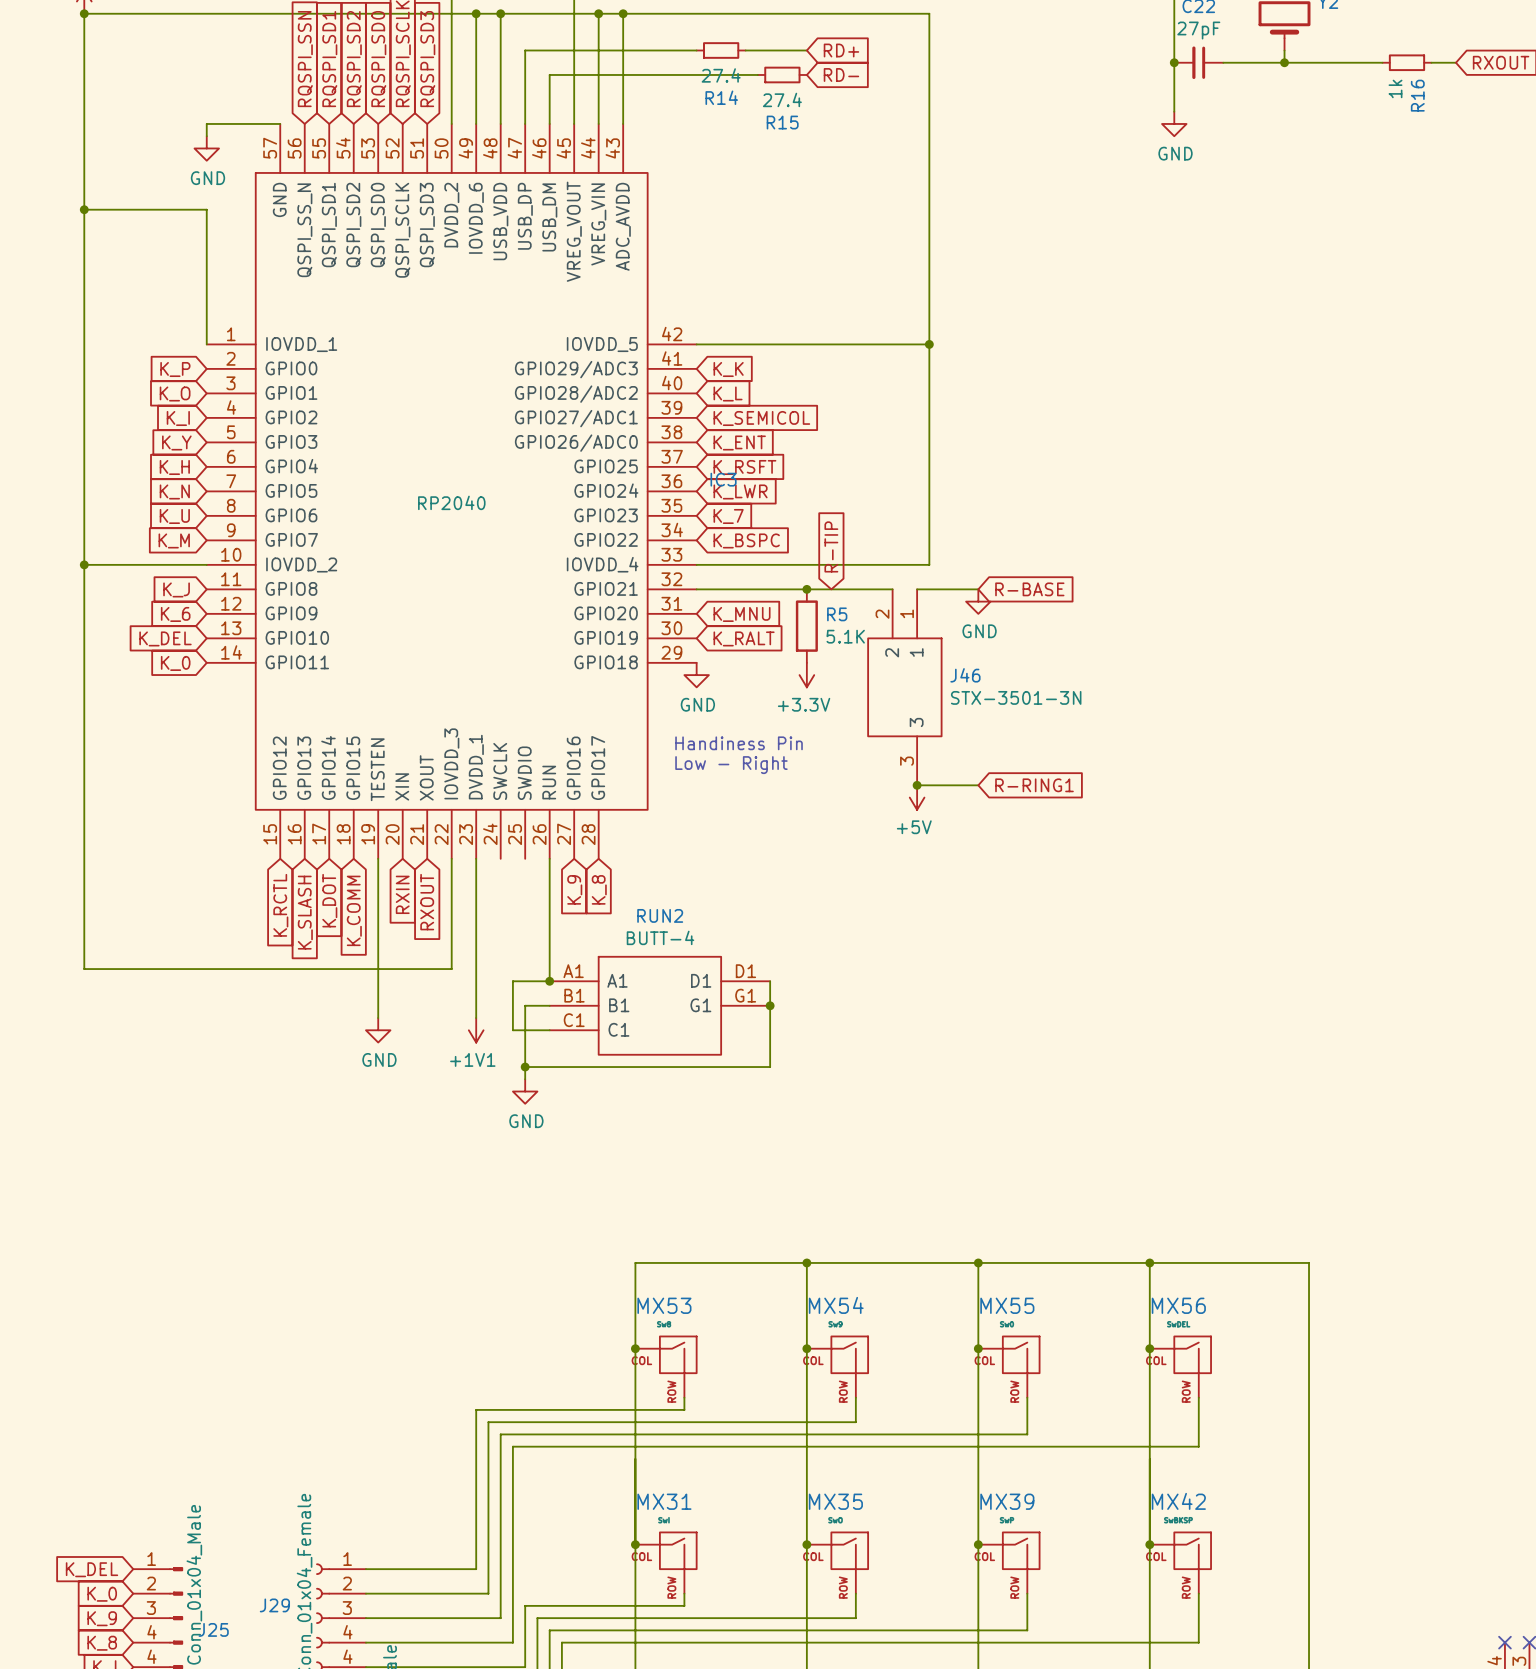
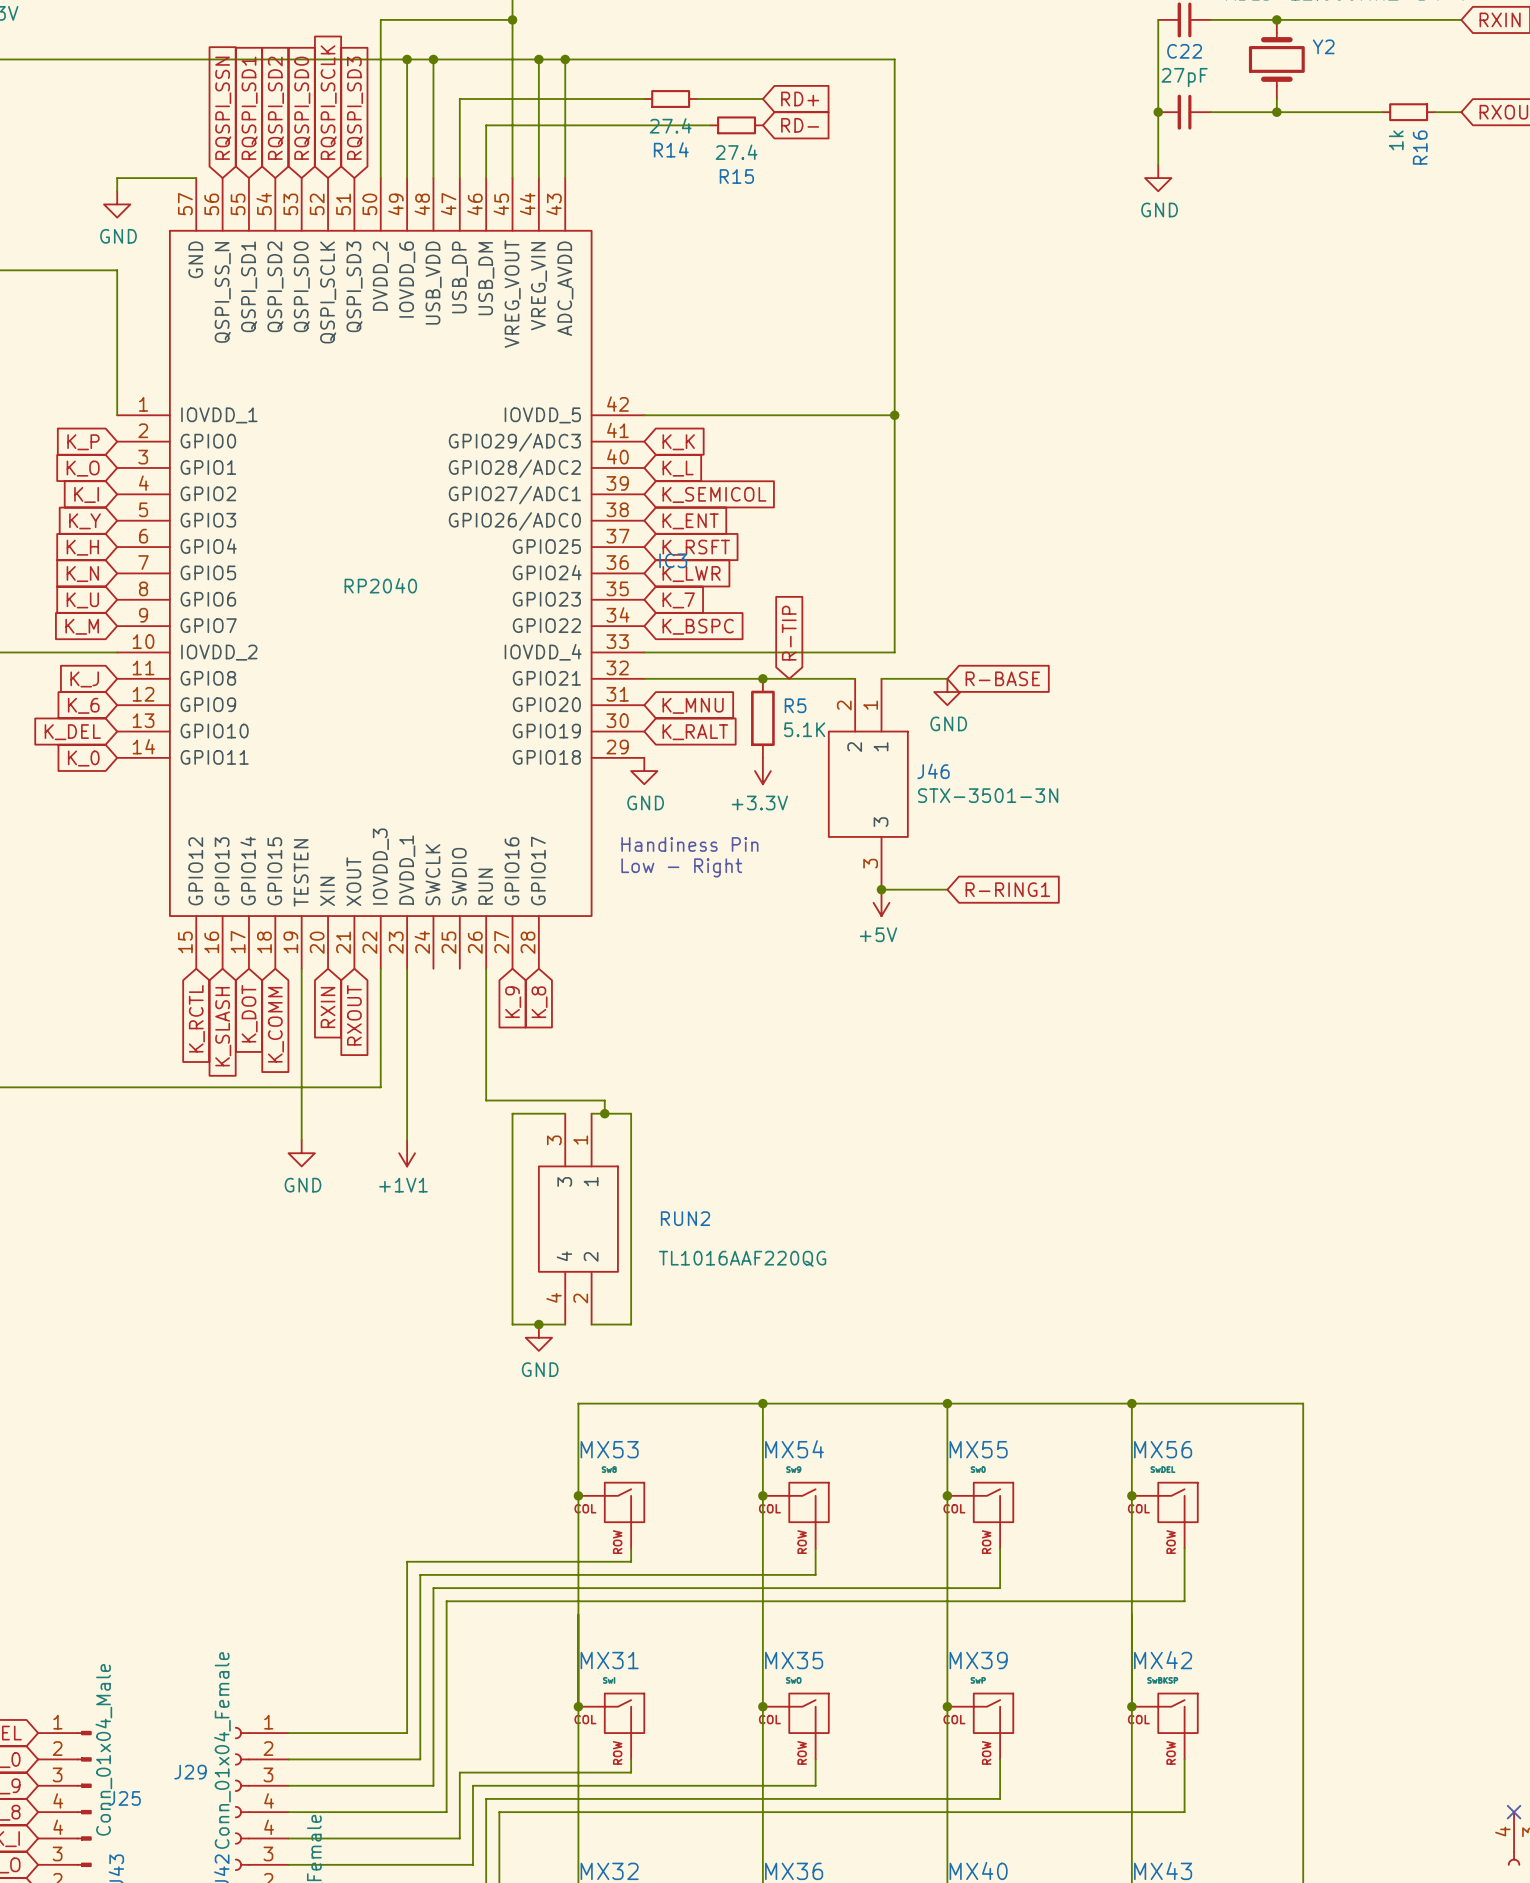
RUN2 name position: RUN2 (660, 915) -> RUN2 (685, 1218)
RUN2 value: BUTT-4 (660, 937) -> TL1016AAF220QG (742, 1258)
RUN2 symbol: [549, 956, 771, 1056] -> [538, 1113, 619, 1325]
wire: (549, 981) (512, 981) (512, 1030) (549, 1030) -> (486, 1100) (604, 1100) (604, 1113)
junction: (549, 981) -> none
wire: (770, 981) (770, 1067) (525, 1067) -> none
wire: none -> (565, 1113) (512, 1113) (512, 1324) (565, 1324)
wire: none -> (591, 1113) (631, 1113) (631, 1324) (591, 1324)
junction: none -> (604, 1113)
wire: (549, 1005) (525, 1005) (525, 1079) -> none
junction: (770, 1005) -> none
junction: (525, 1067) -> none
power symbol position: GND (525, 1091) -> GND (538, 1337)
junction: none -> (538, 1324)

